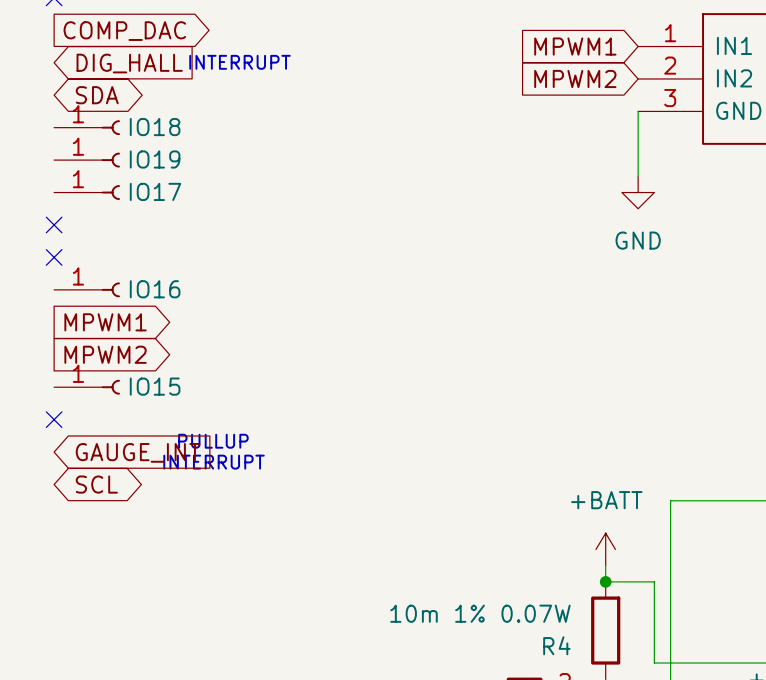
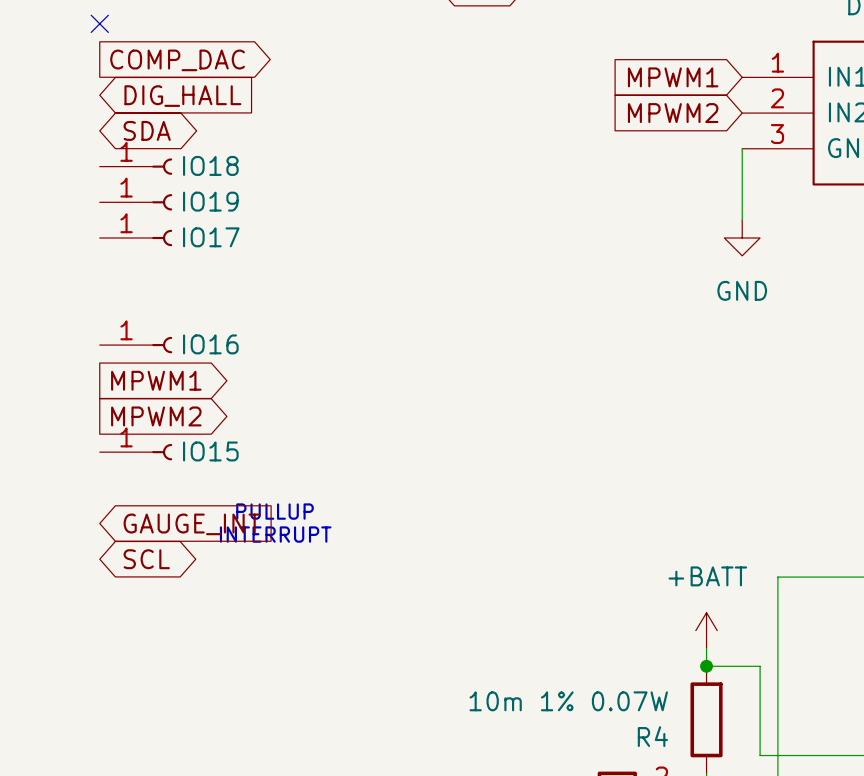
text: INTERRUPT (239, 62) -> none
no-connect mark: (54, 224) -> none
no-connect mark: (54, 257) -> none
no-connect mark: (54, 419) -> none

